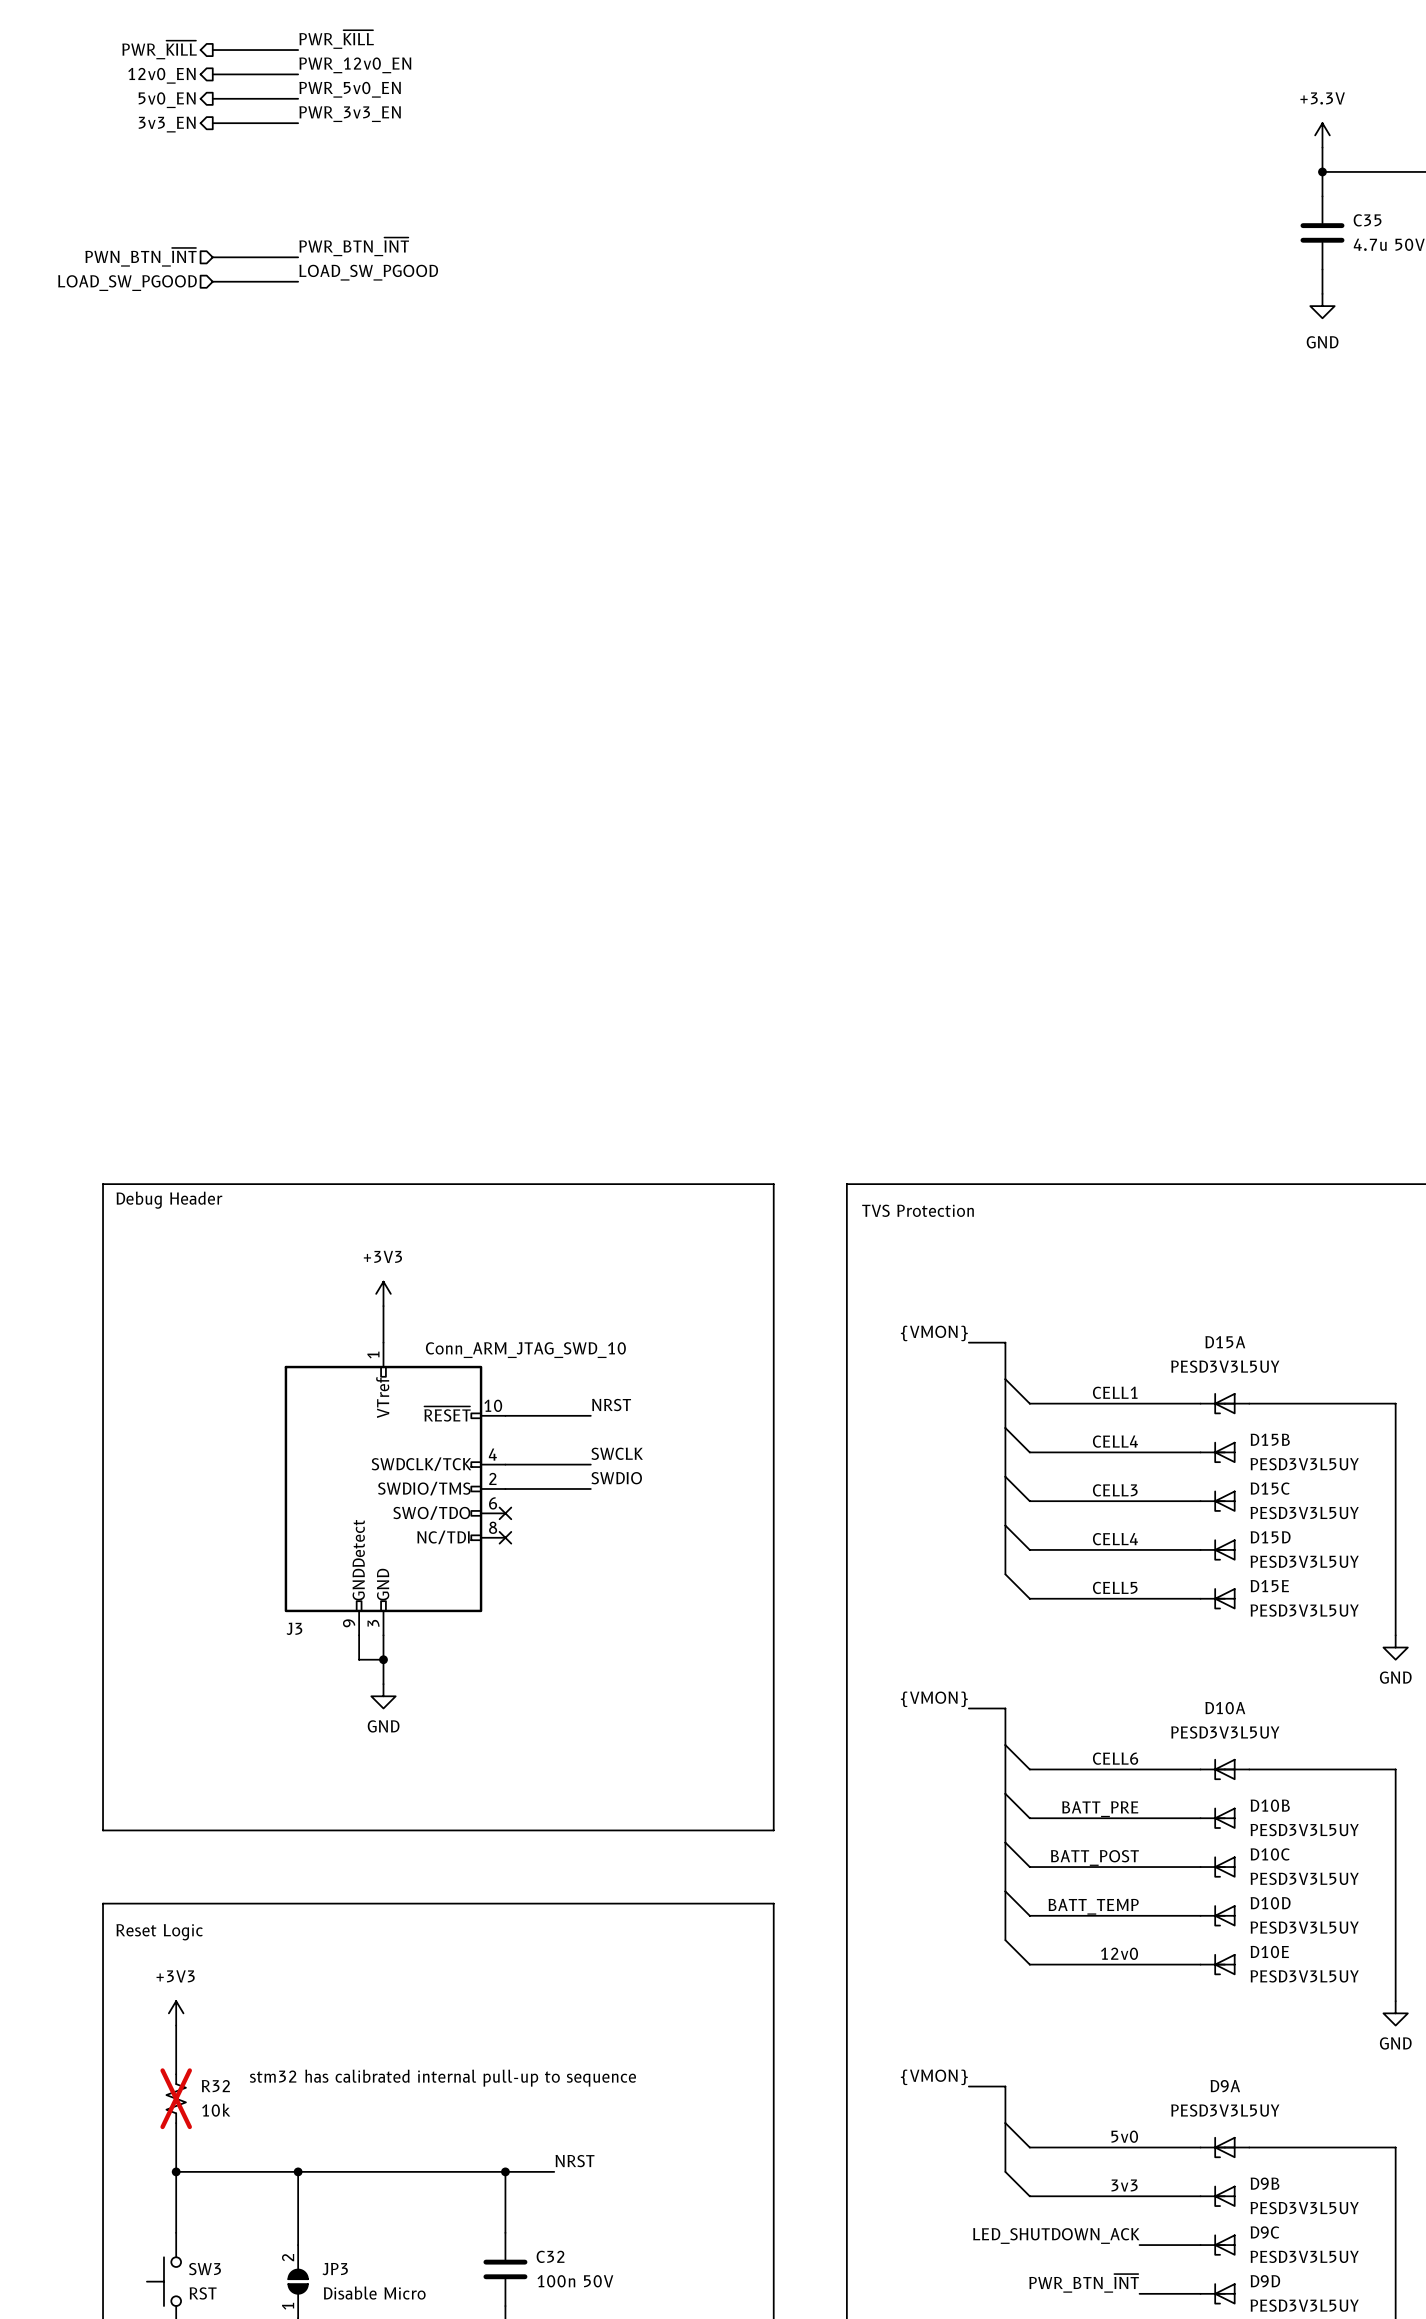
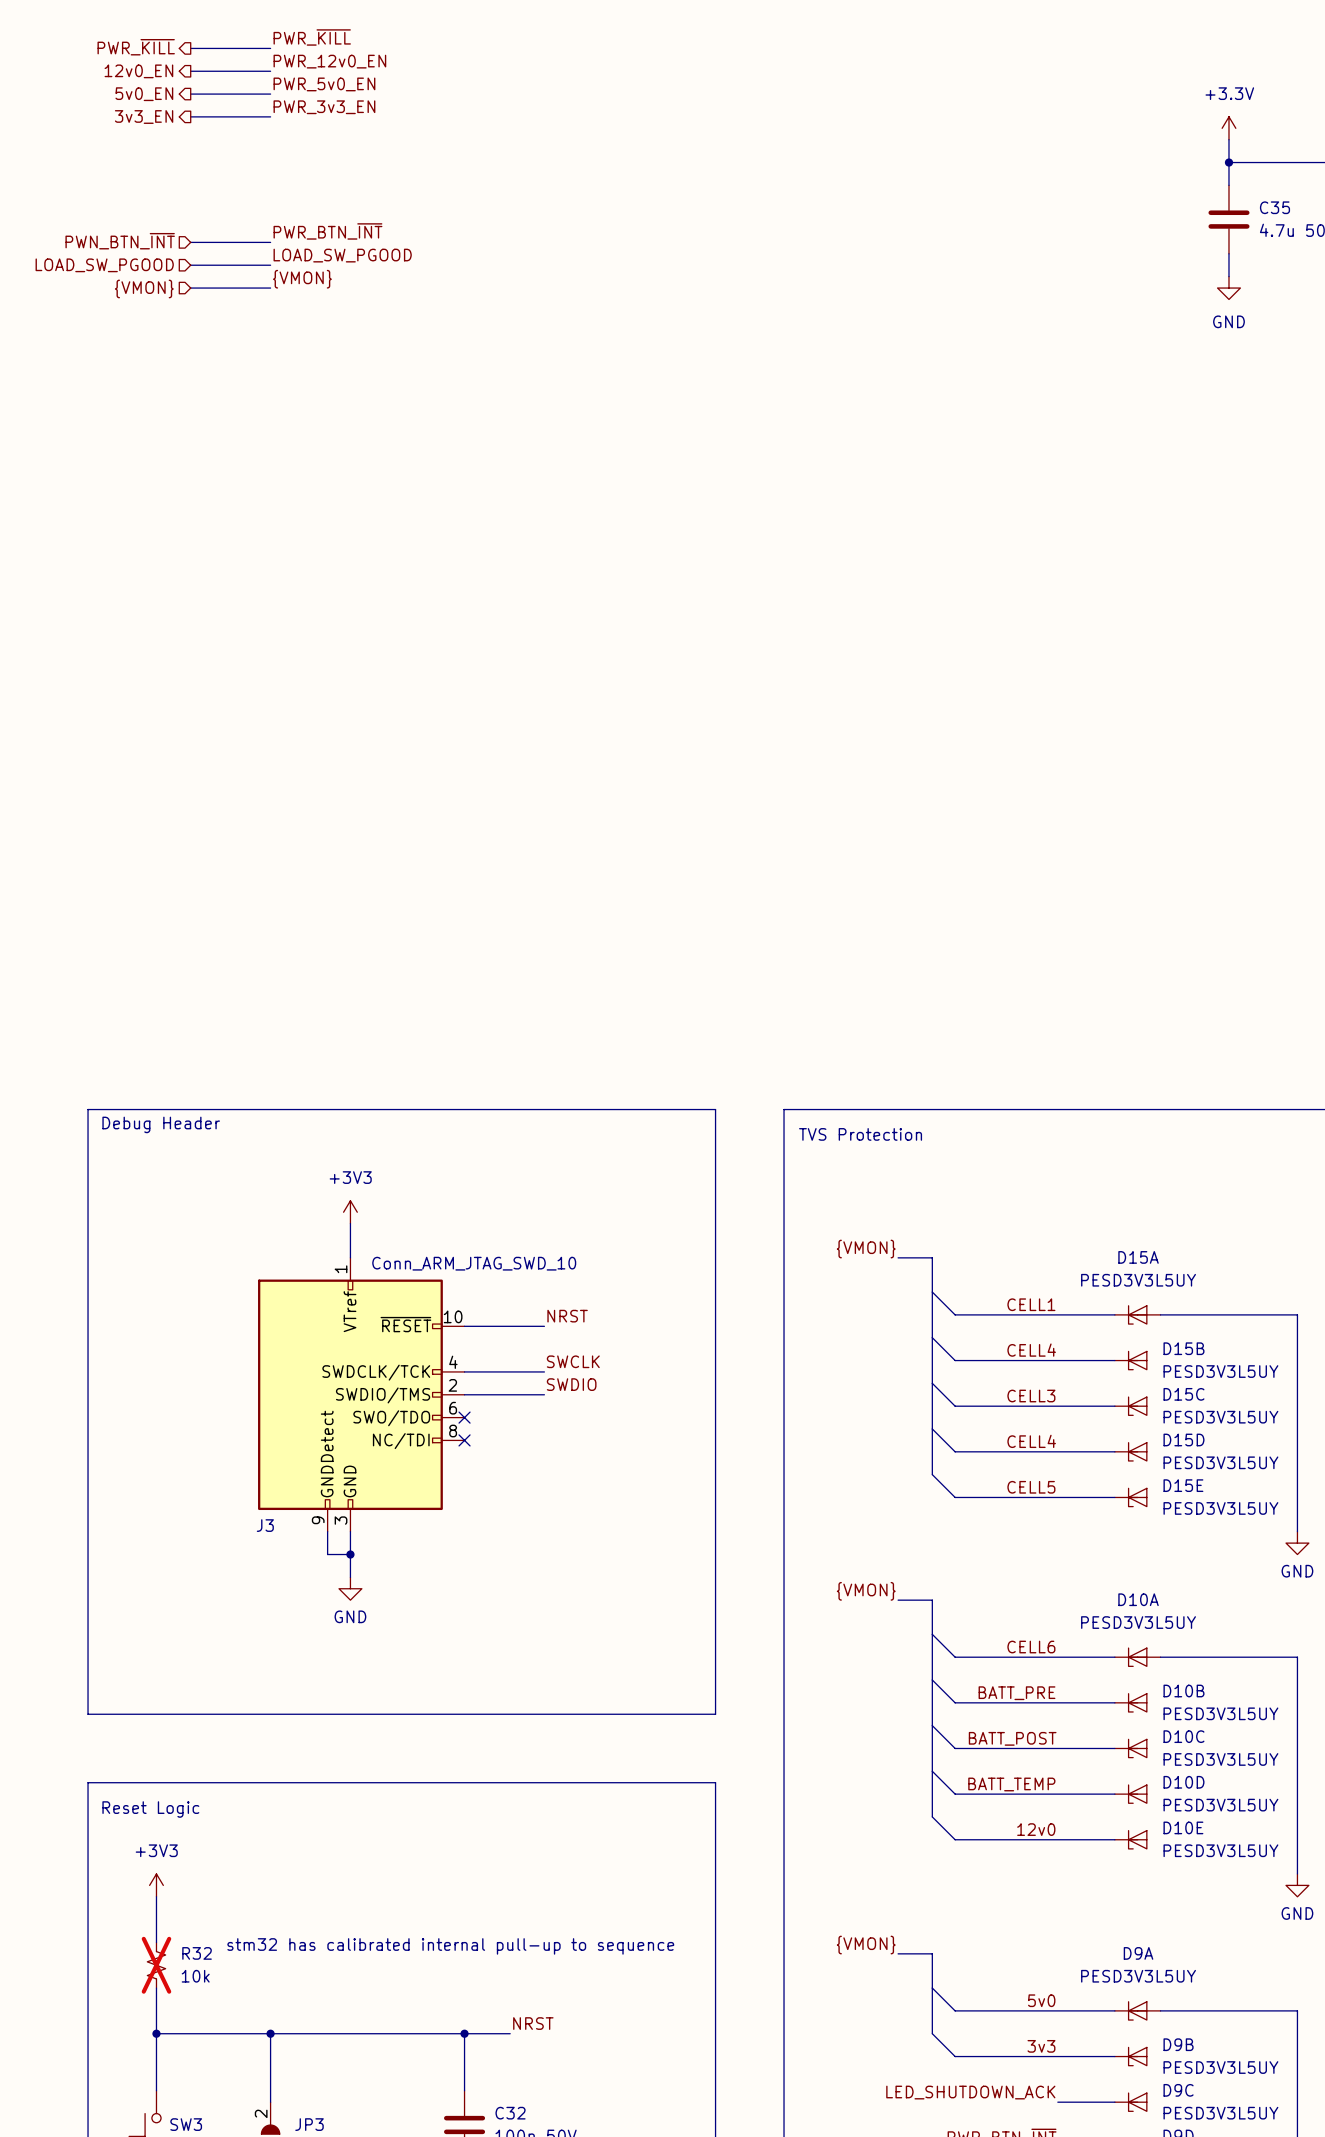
label: none -> {VMON} (302, 279)
bus: none -> (190, 288) (270, 288)
hierarchical label: none -> {VMON} (144, 288)

